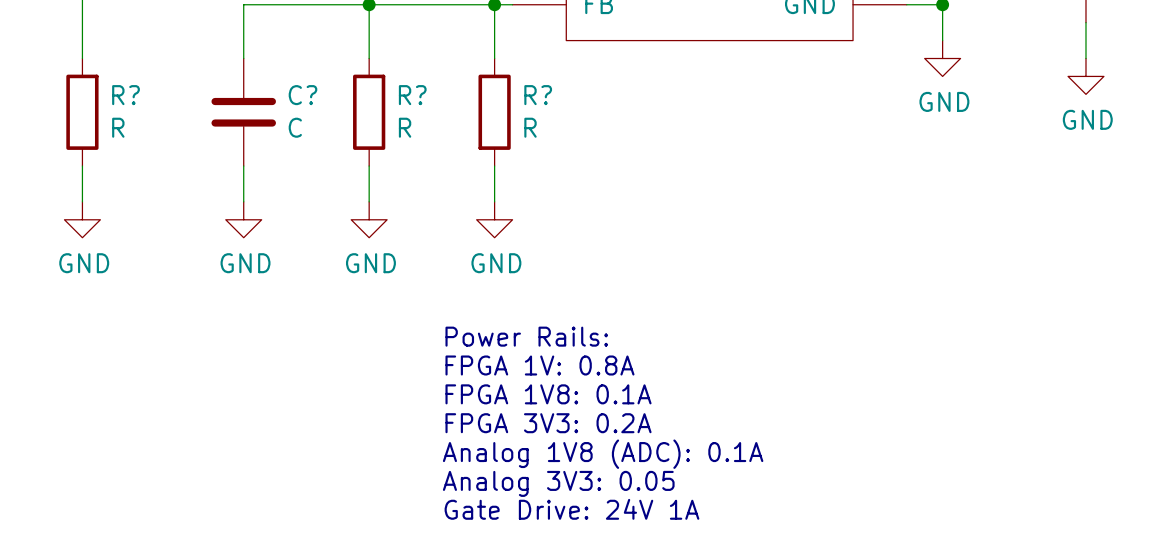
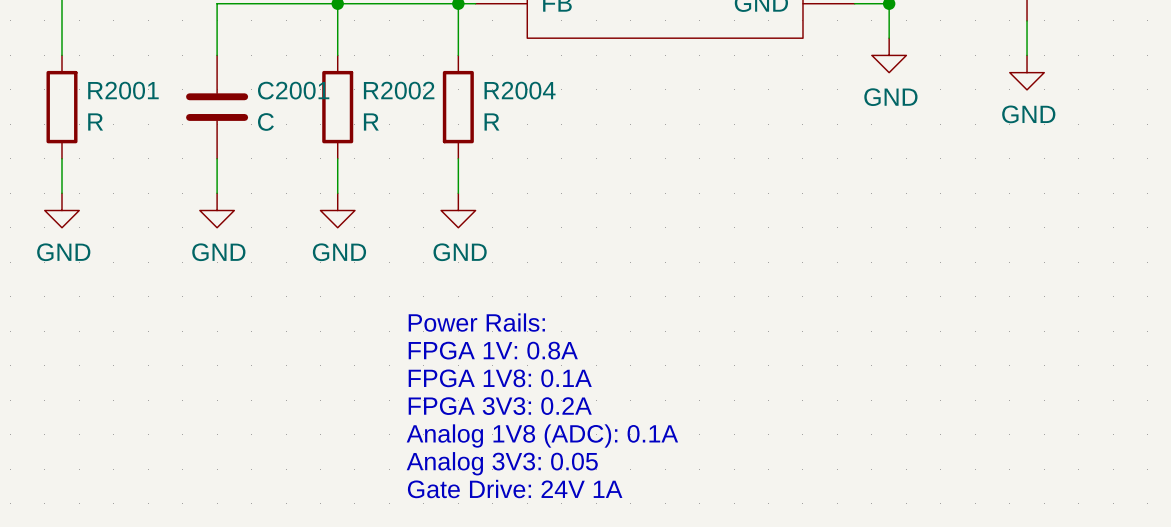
R? name: R? (126, 95) -> R2001 (123, 90)
C? name: C? (302, 95) -> C2001 (293, 90)
R? name: R? (412, 95) -> R2002 (399, 90)
R? name: R? (538, 95) -> R2004 (520, 90)

